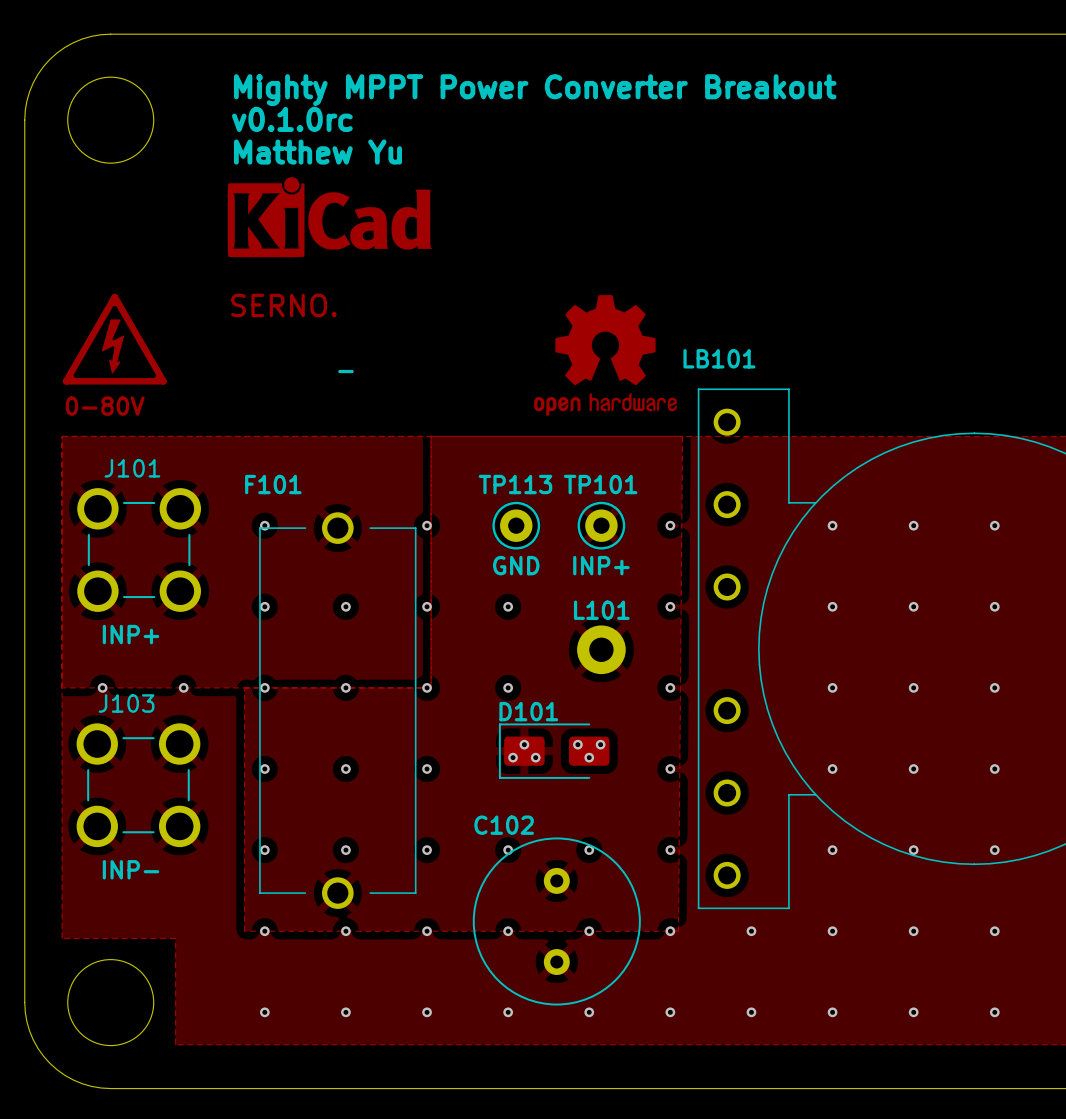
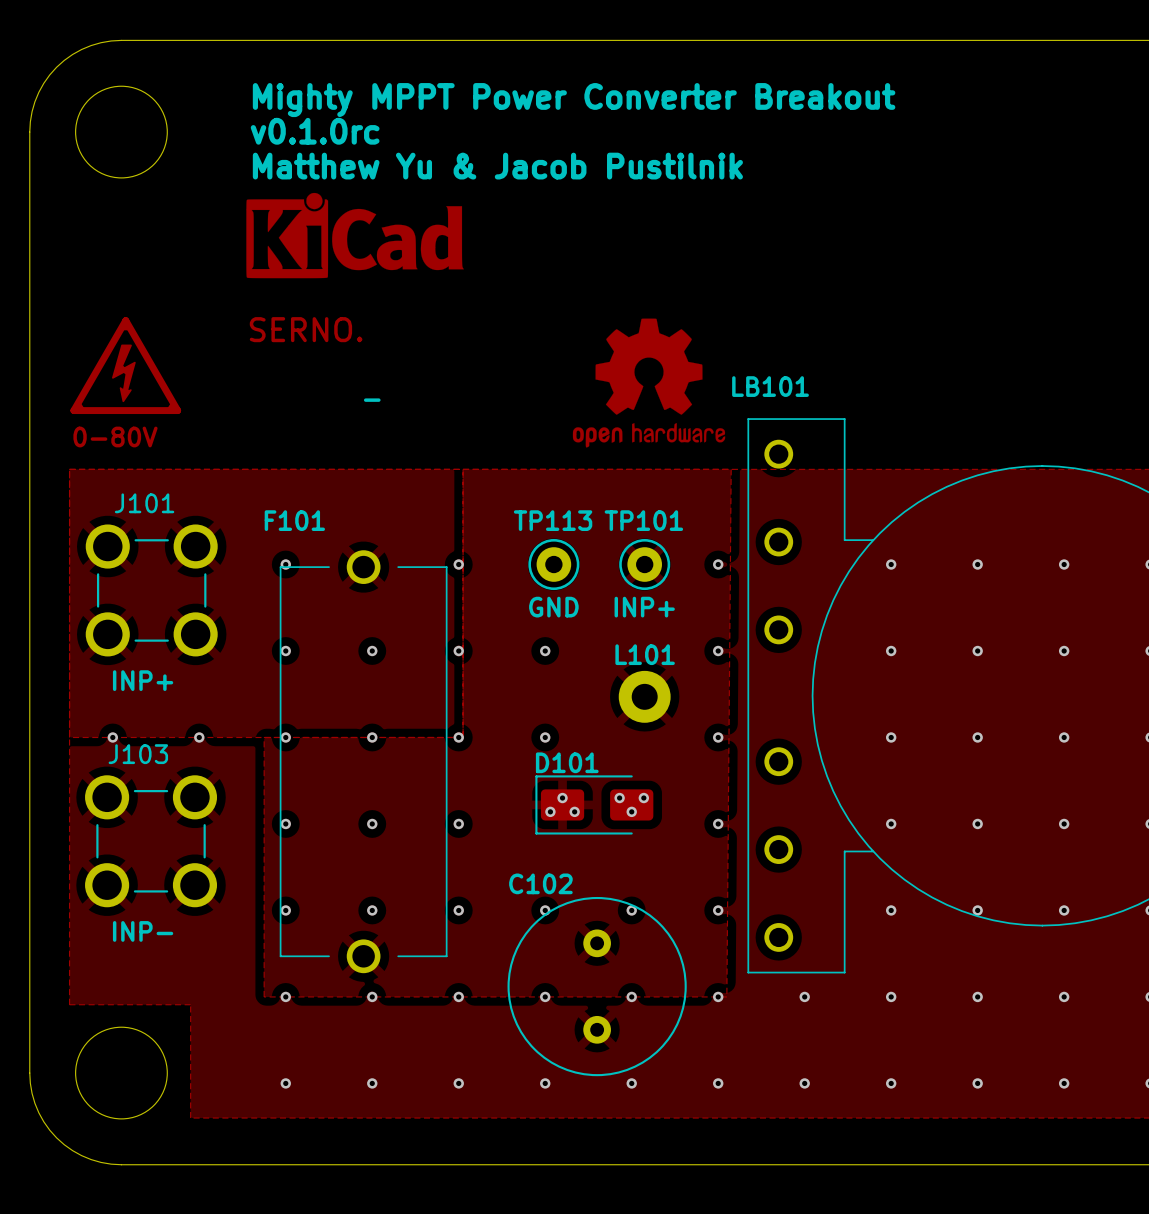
text: Matthew Yu (317, 152) -> Matthew Yu & Jacob Pustilnik (497, 166)

